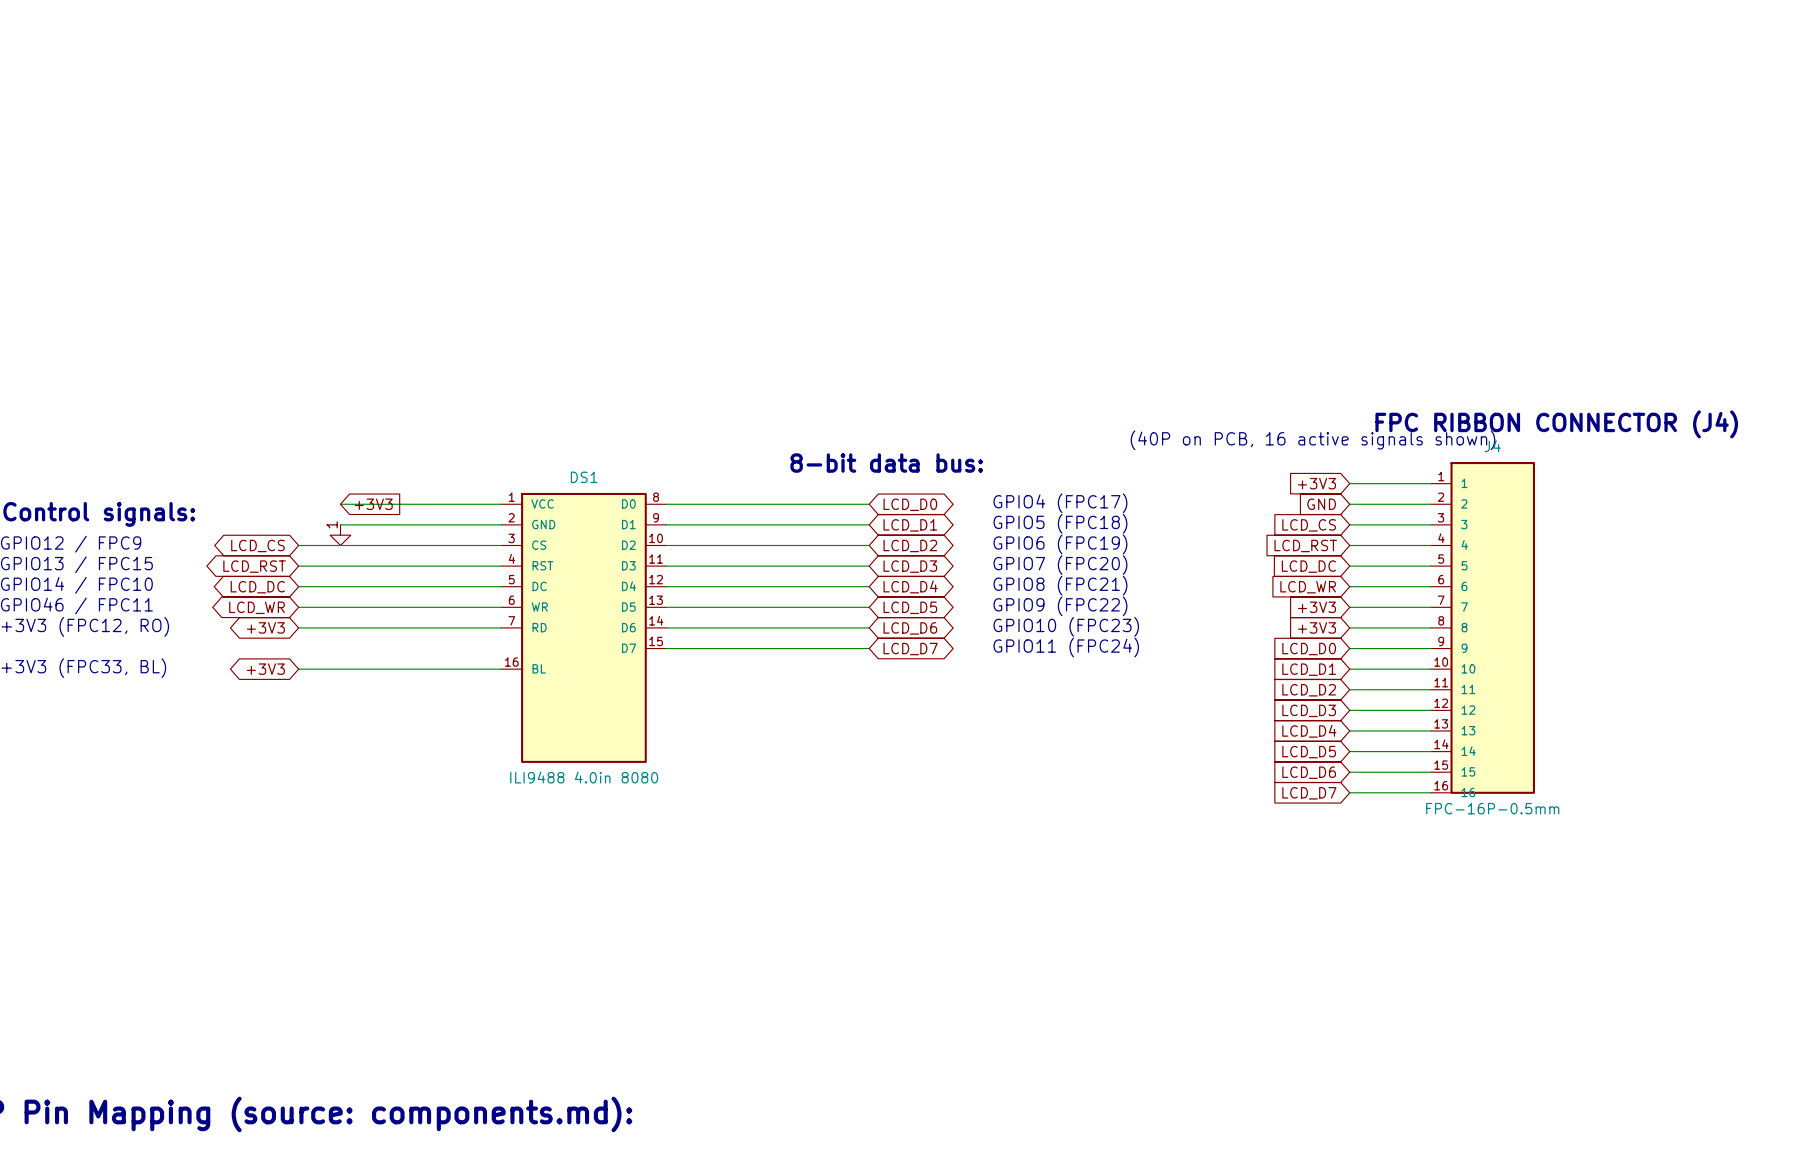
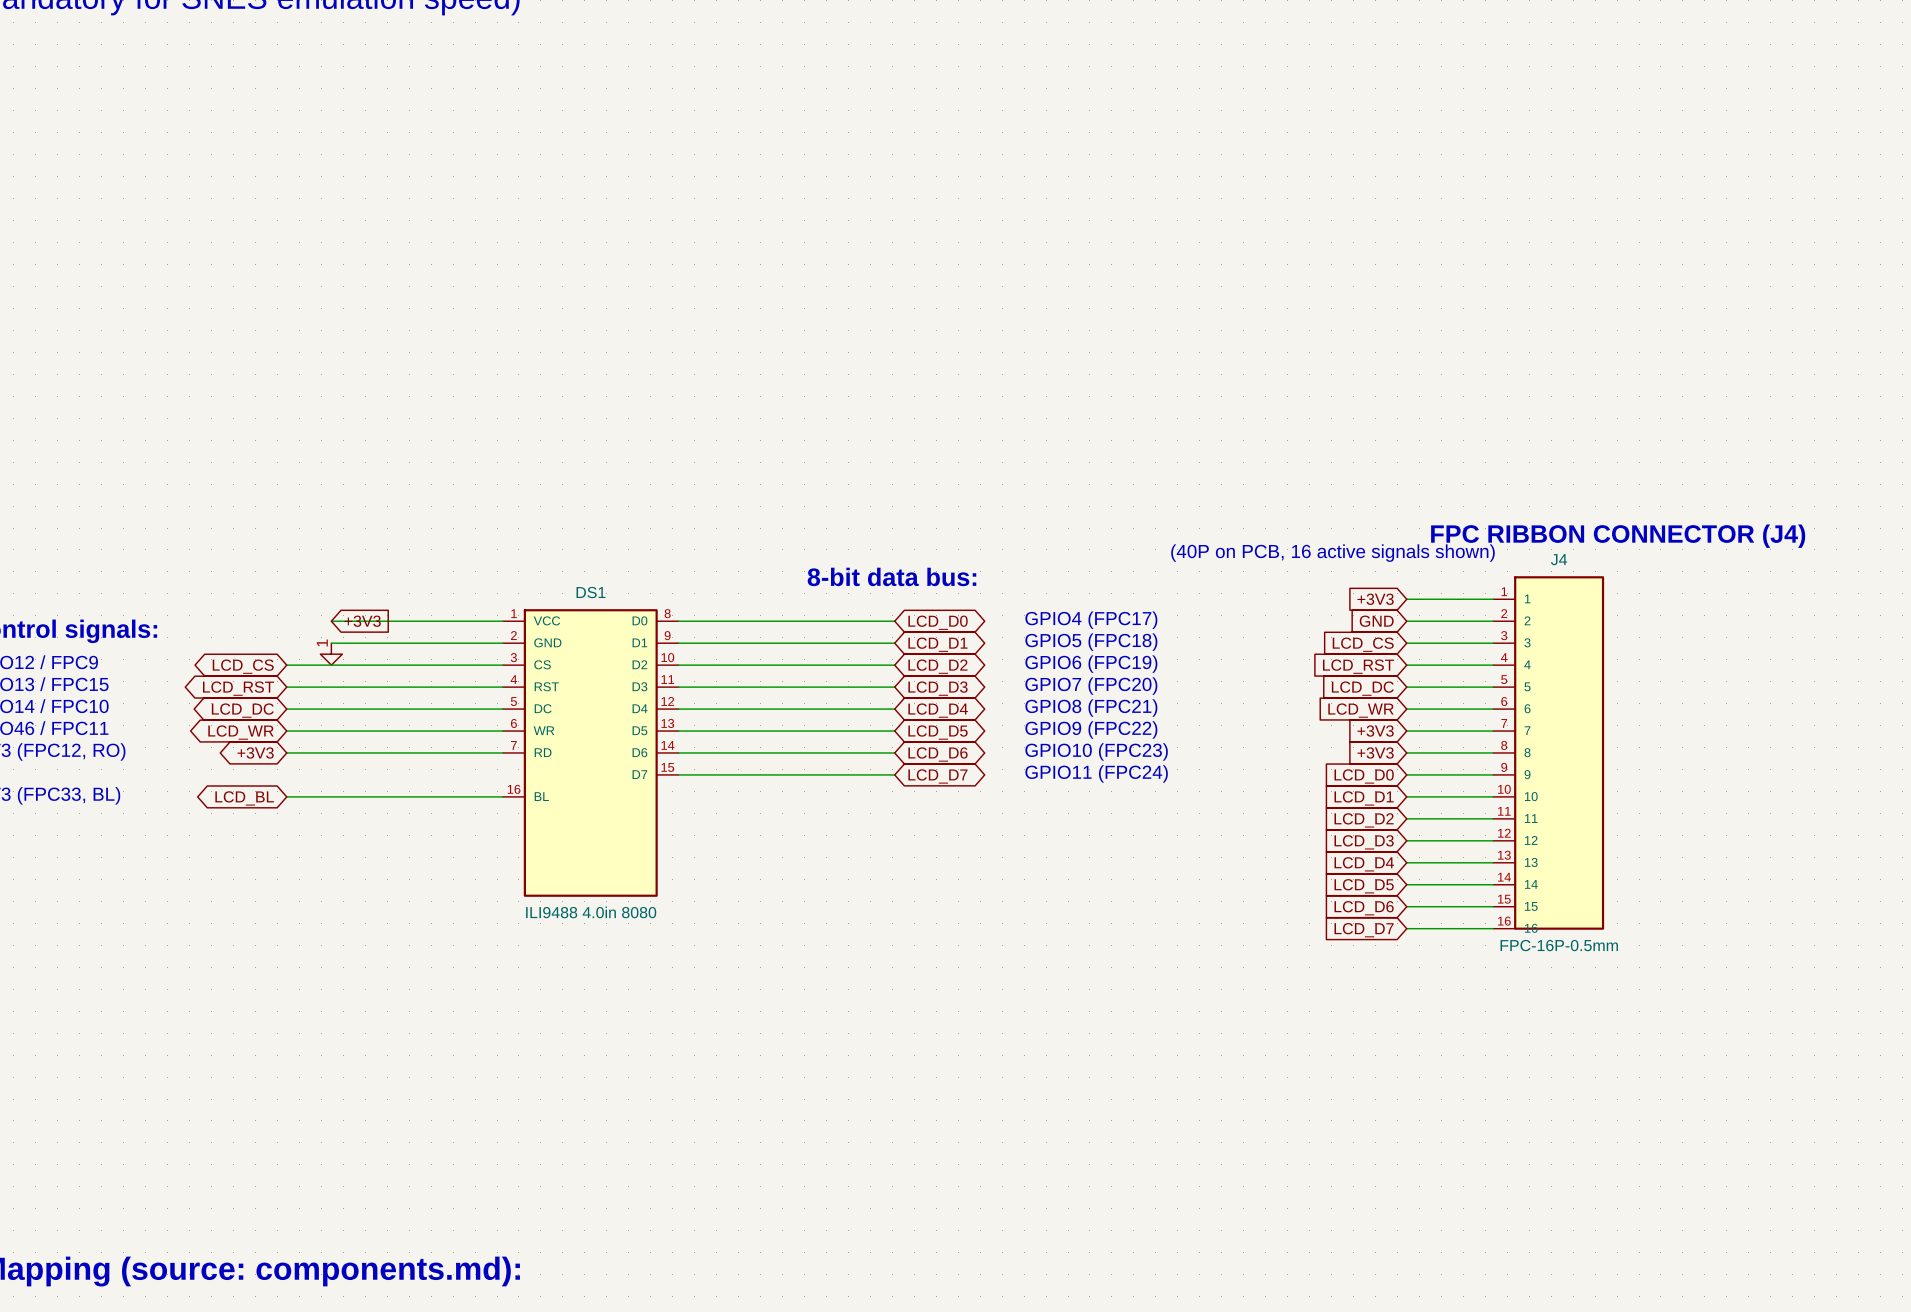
global label: +3V3 (265, 669) -> LCD_BL (244, 798)

